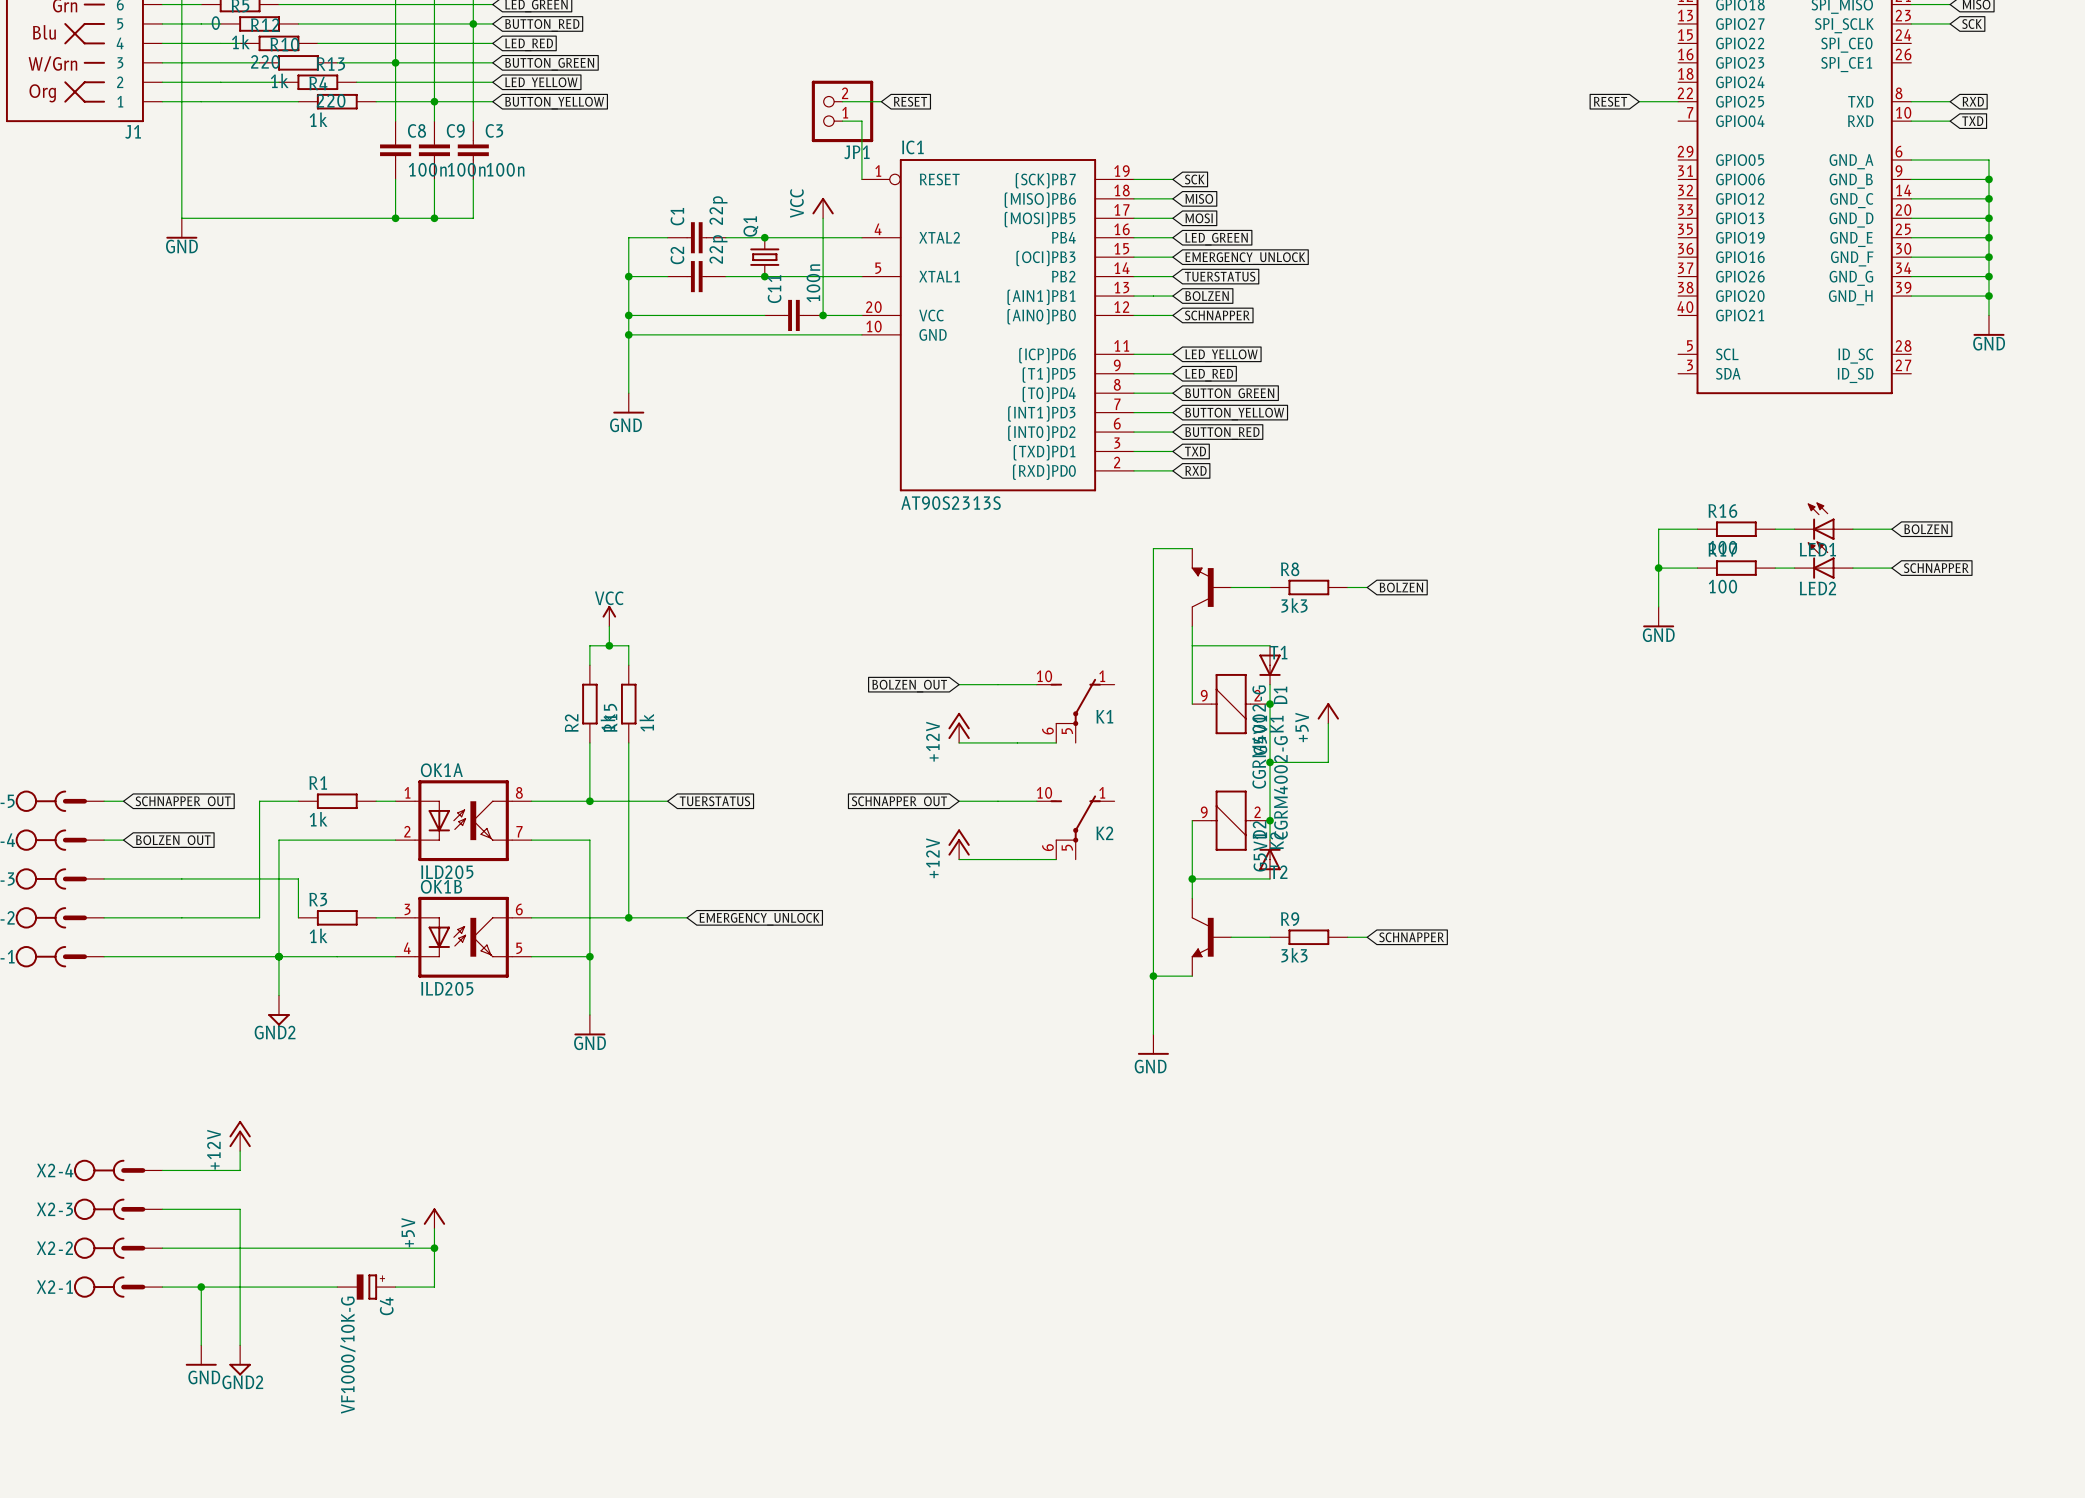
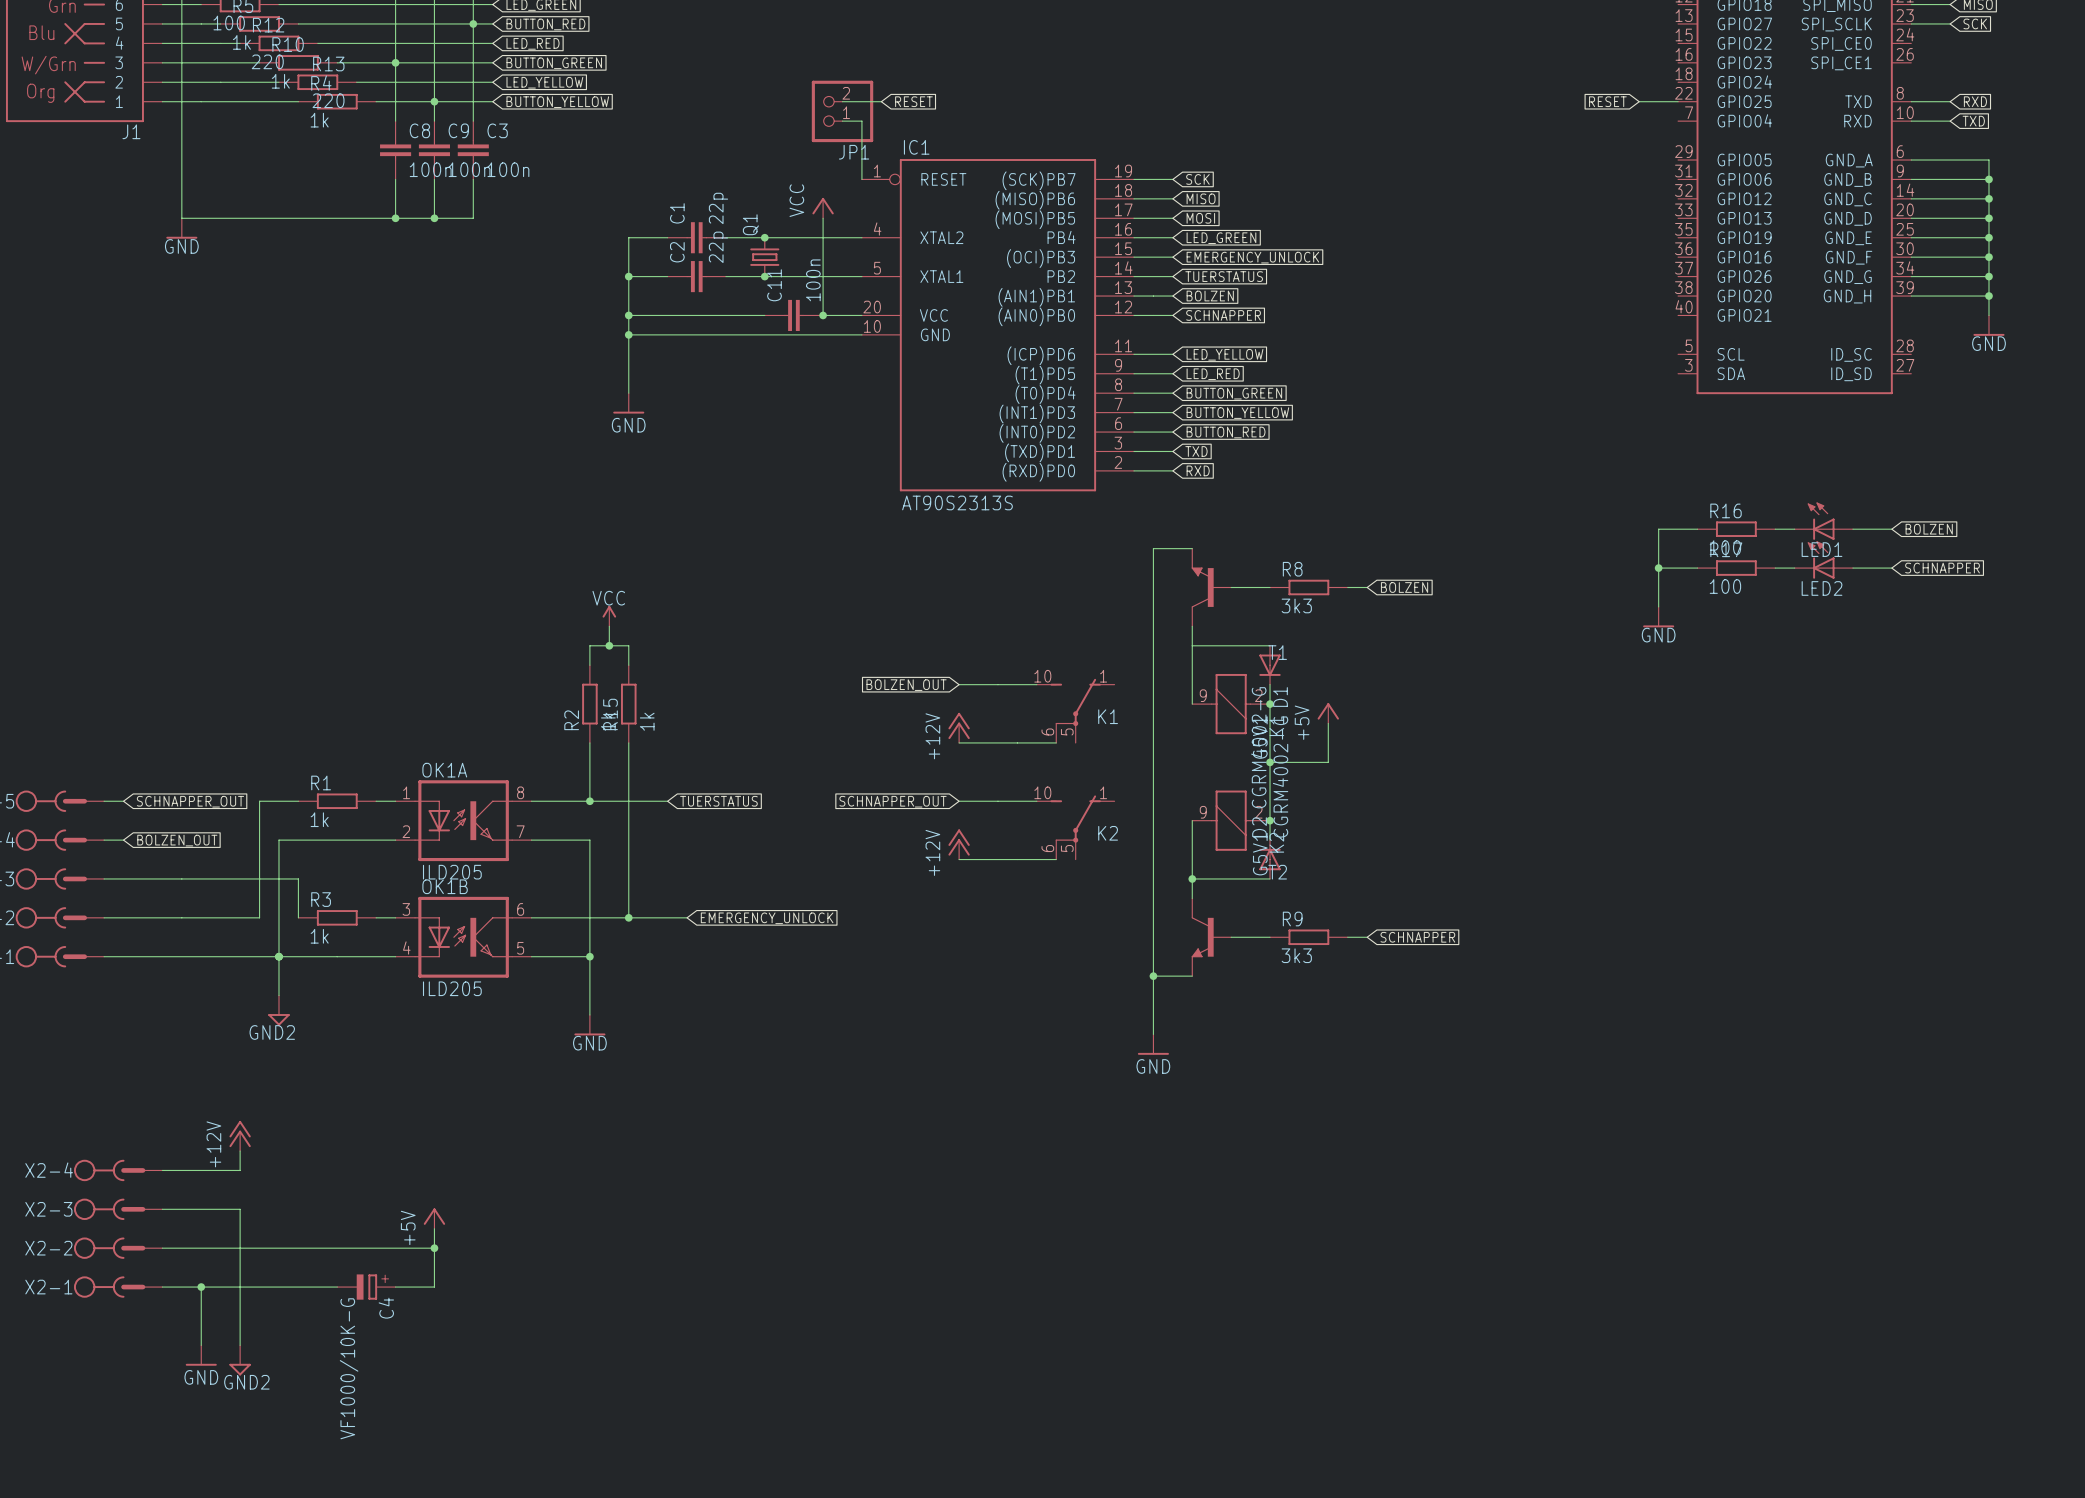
part value: 0 (215, 23) -> 100 (229, 23)

